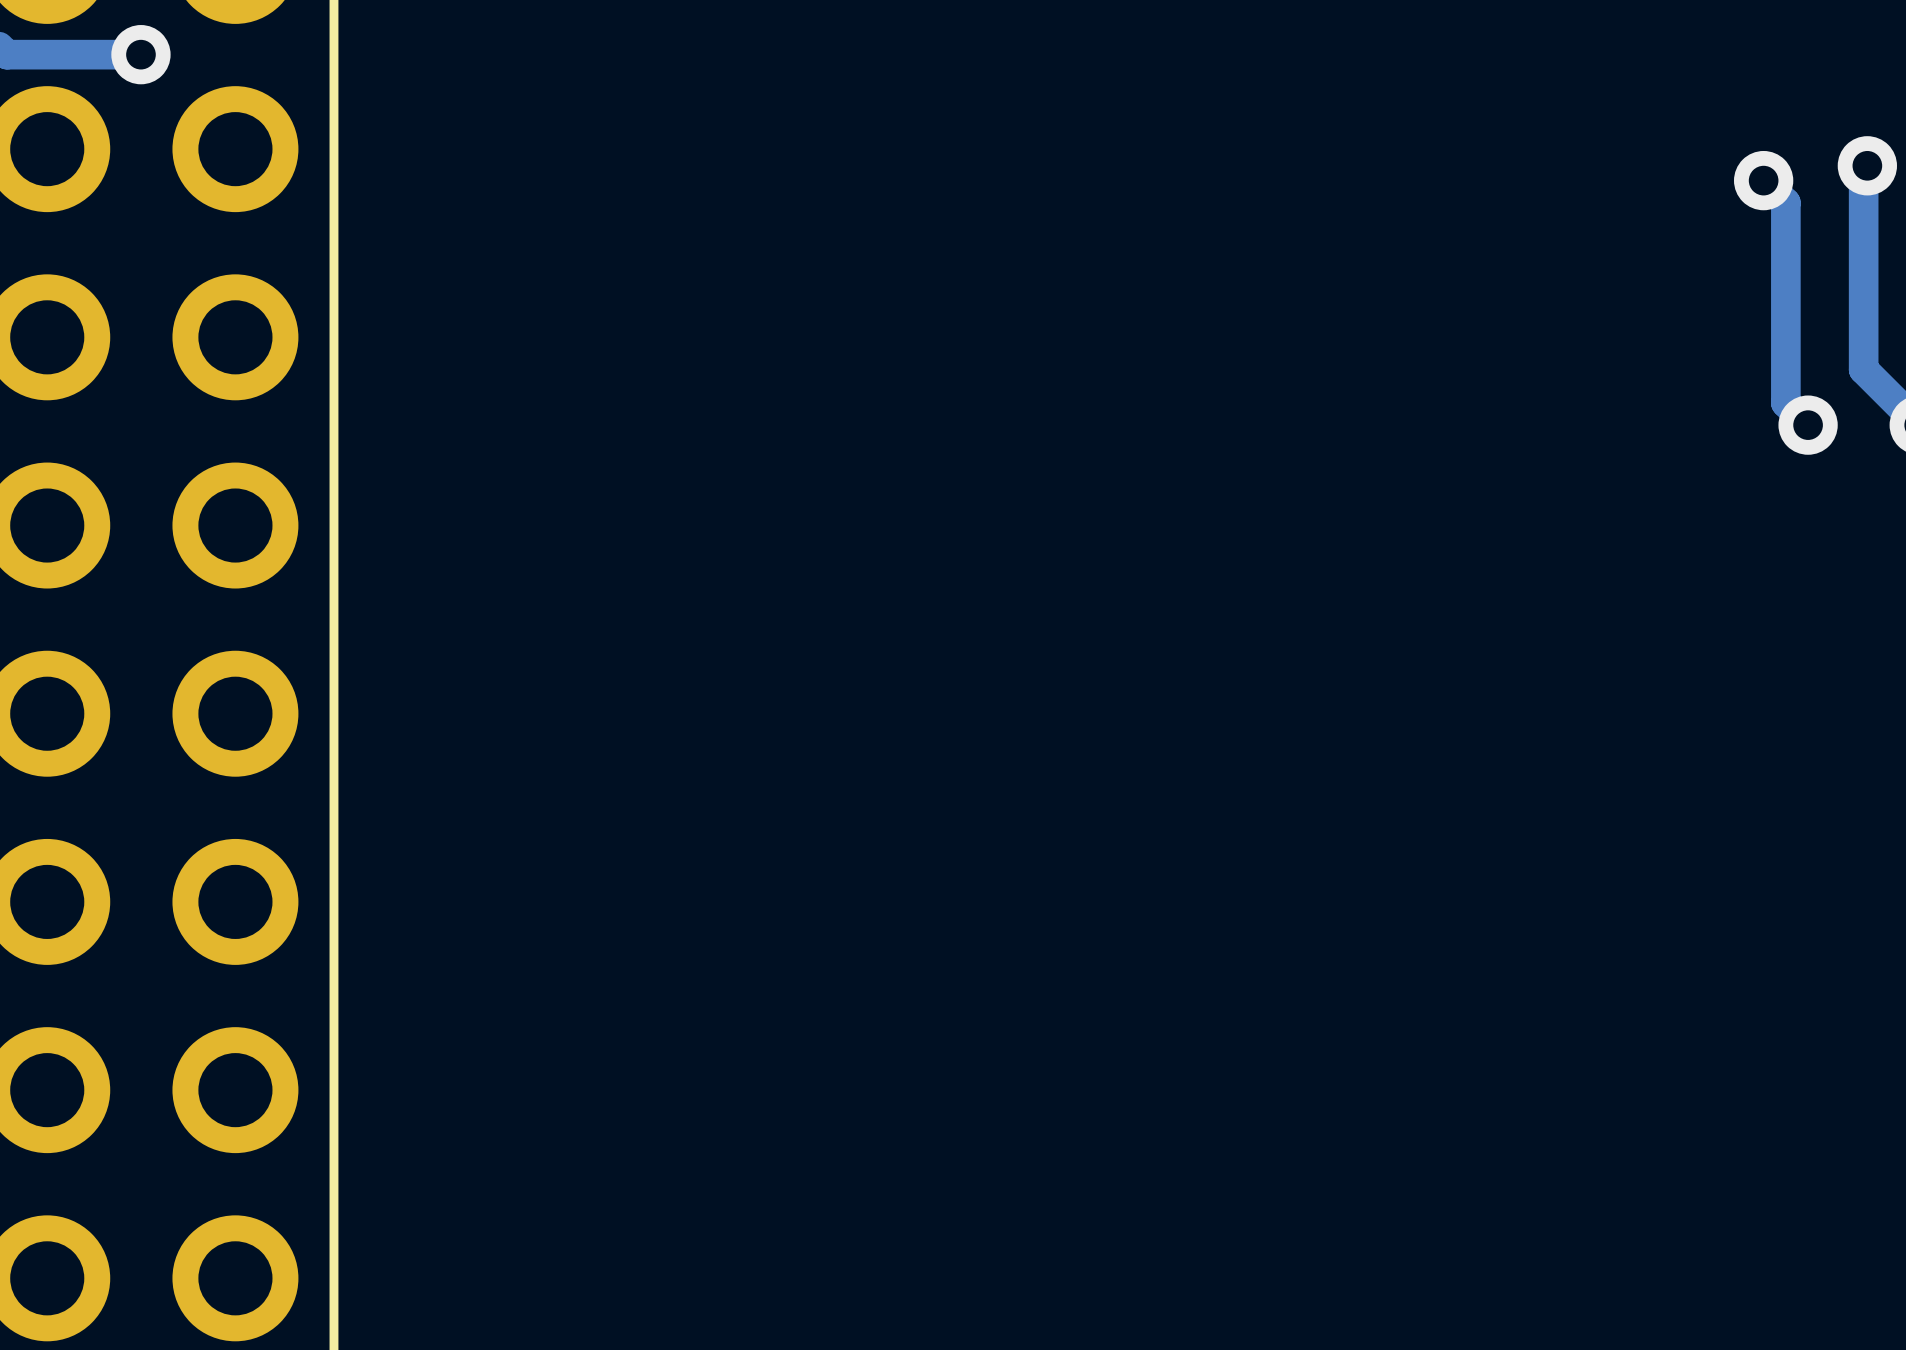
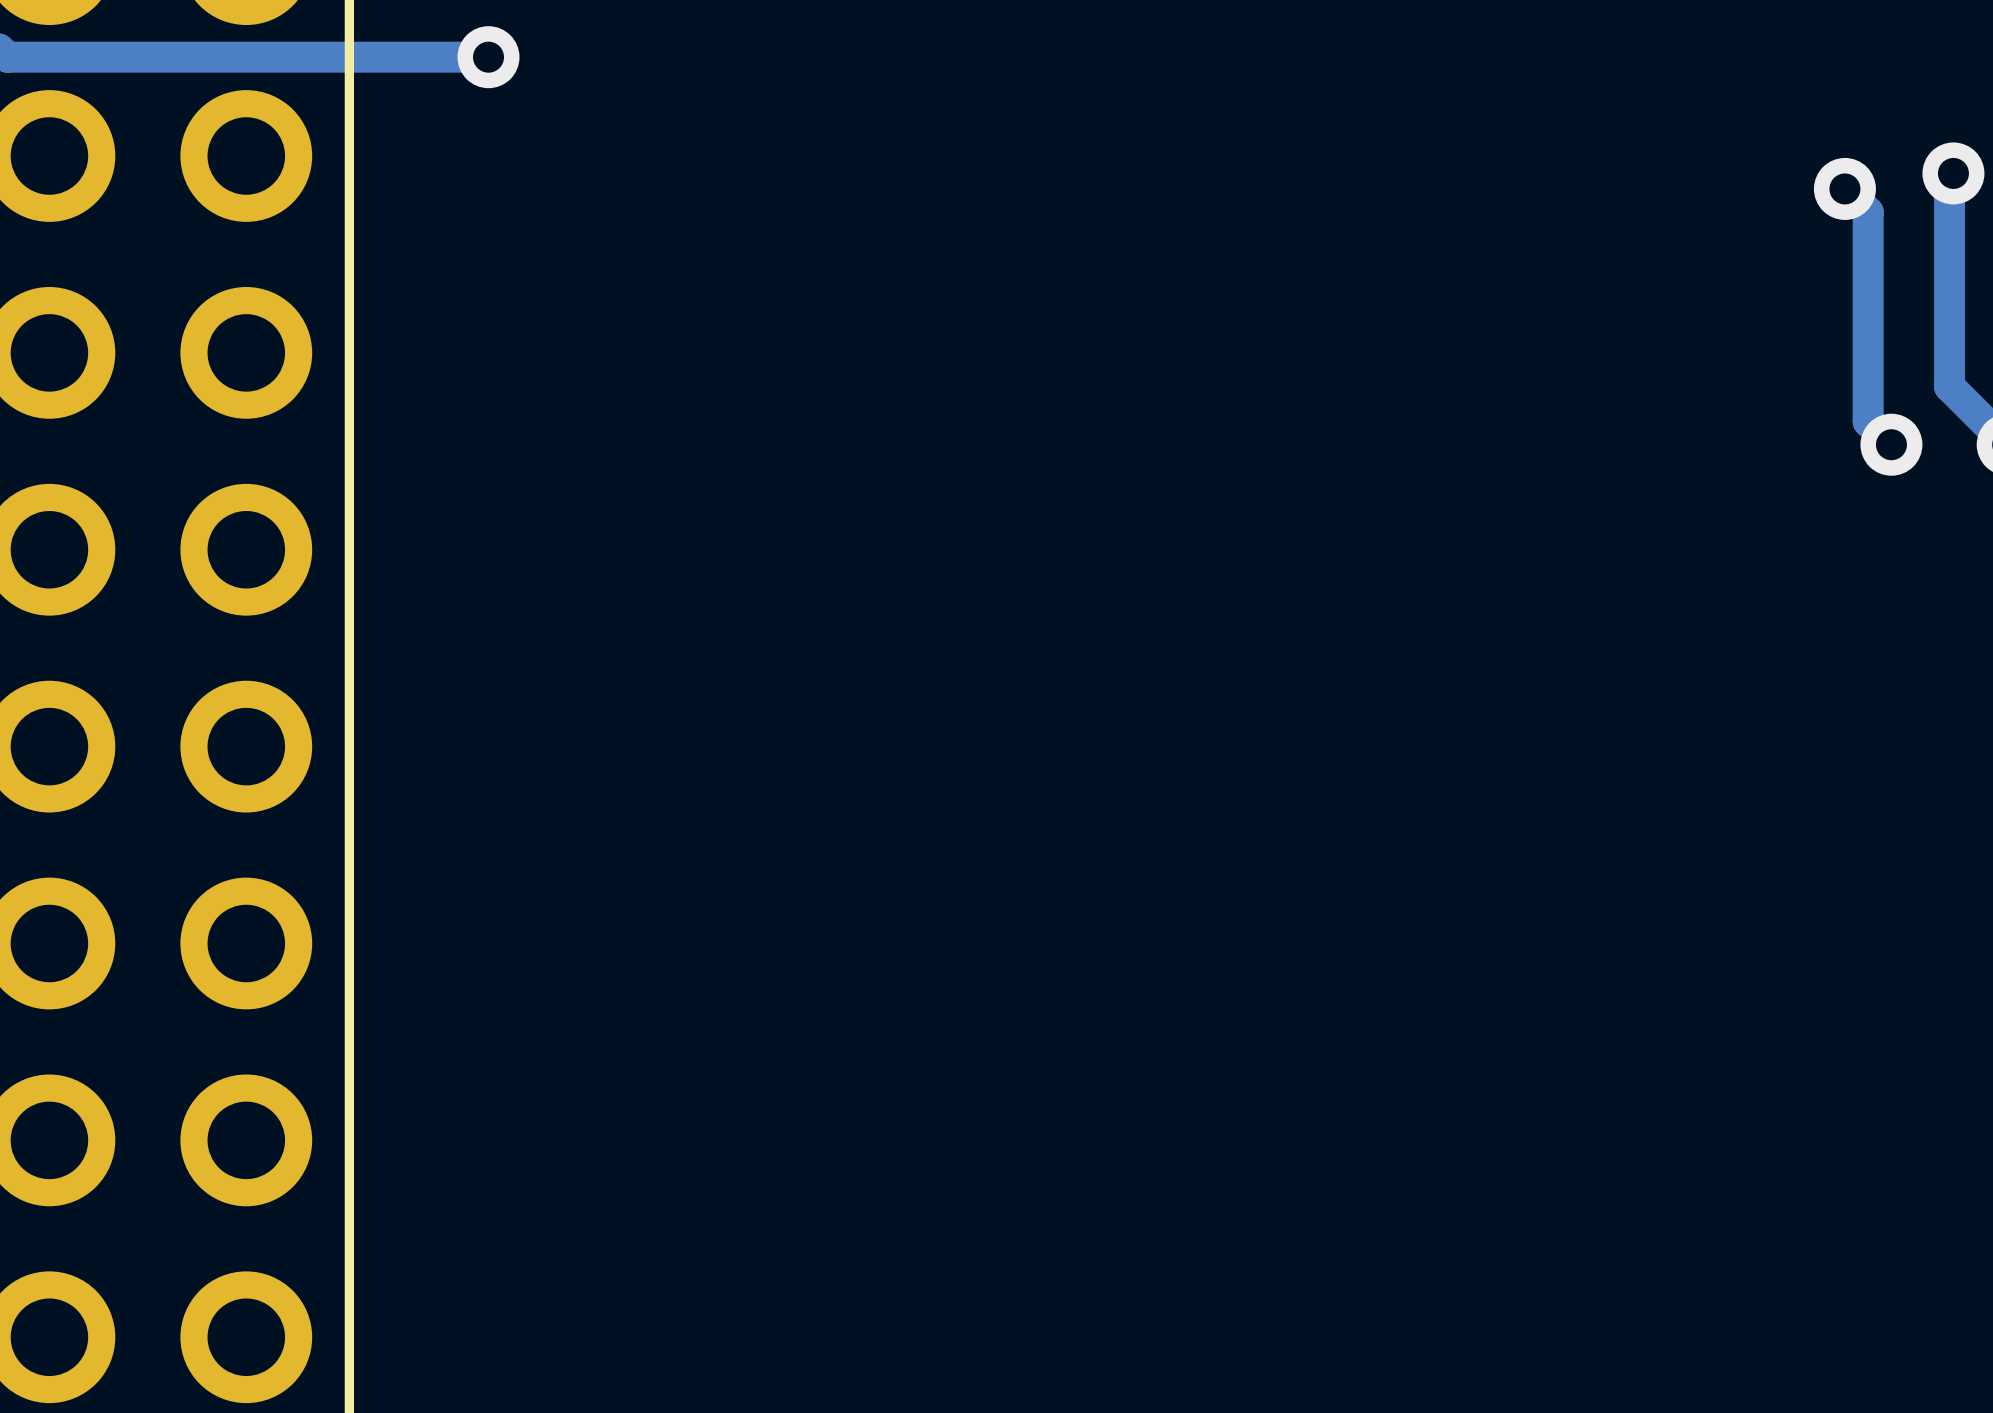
via: (140, 54) -> none
track: none -> (488, 57) (147, 57)
via: none -> (488, 57)

